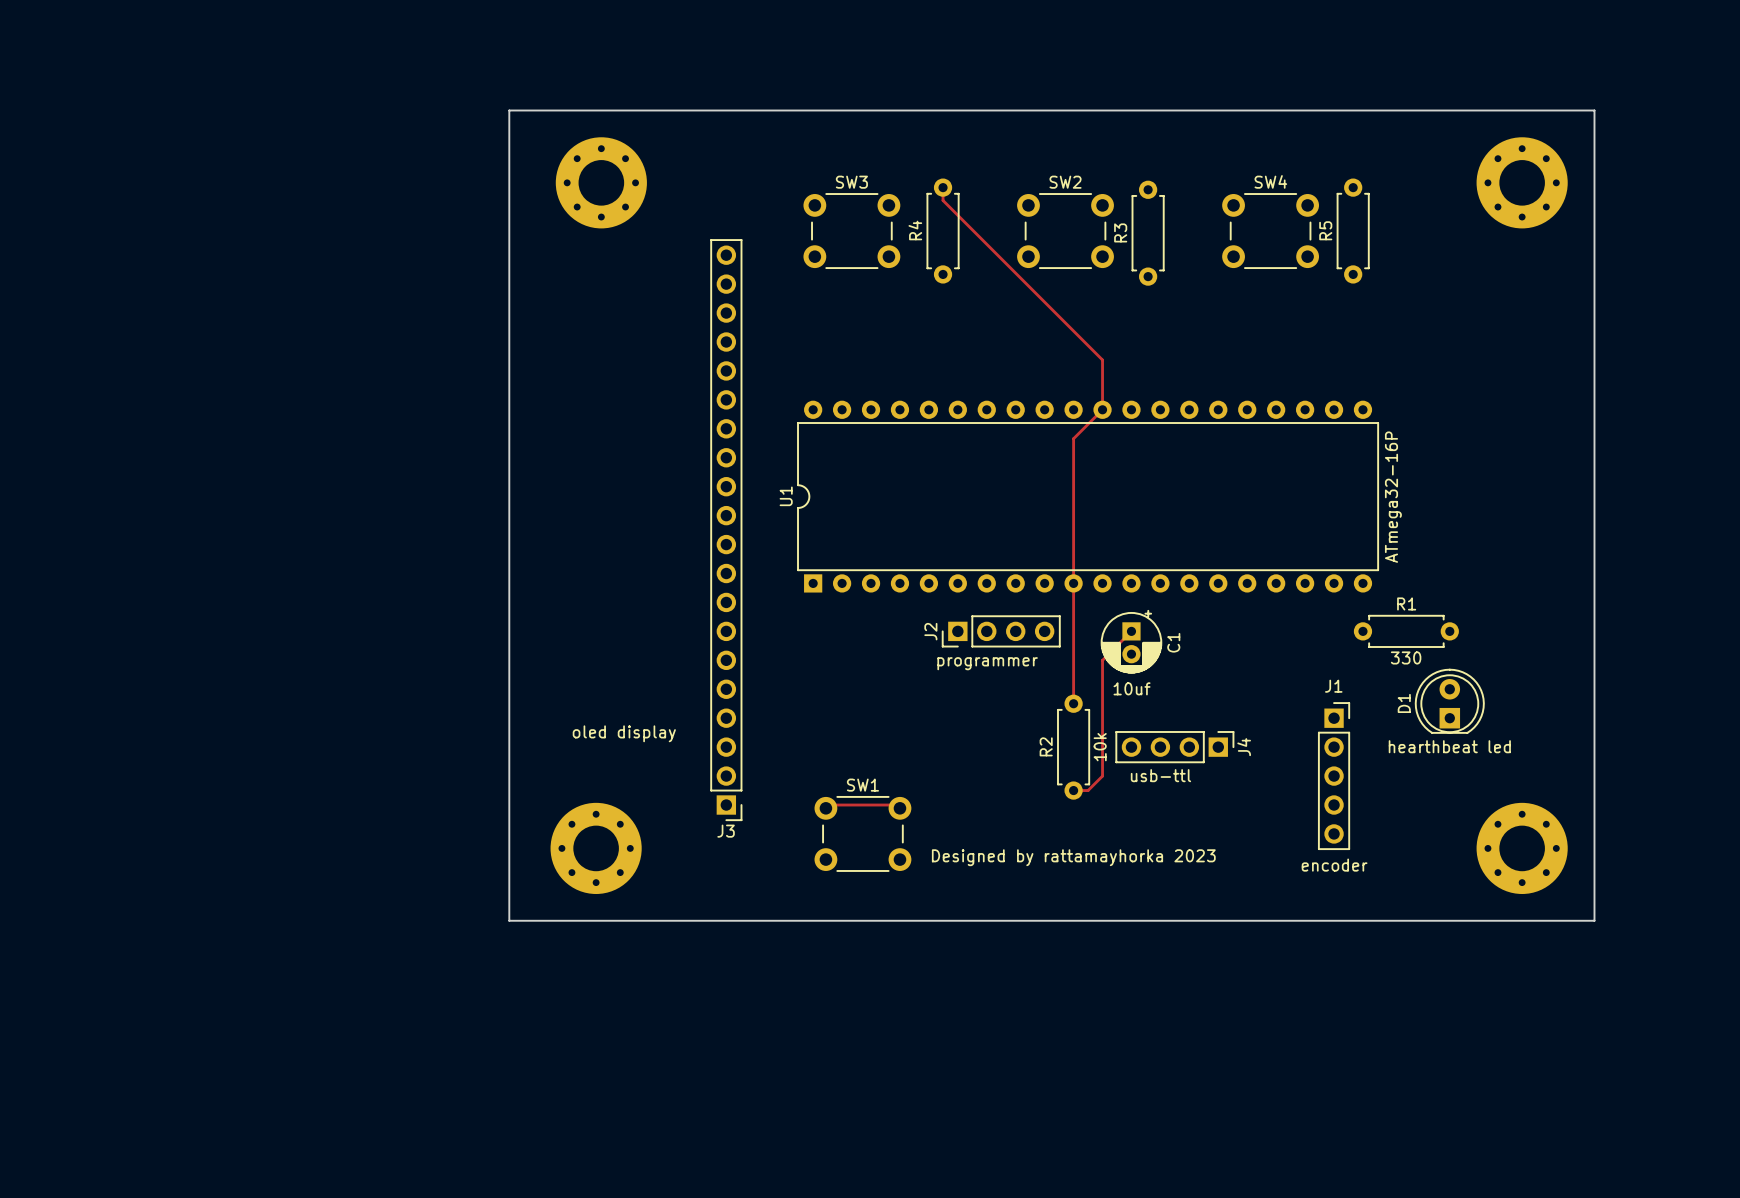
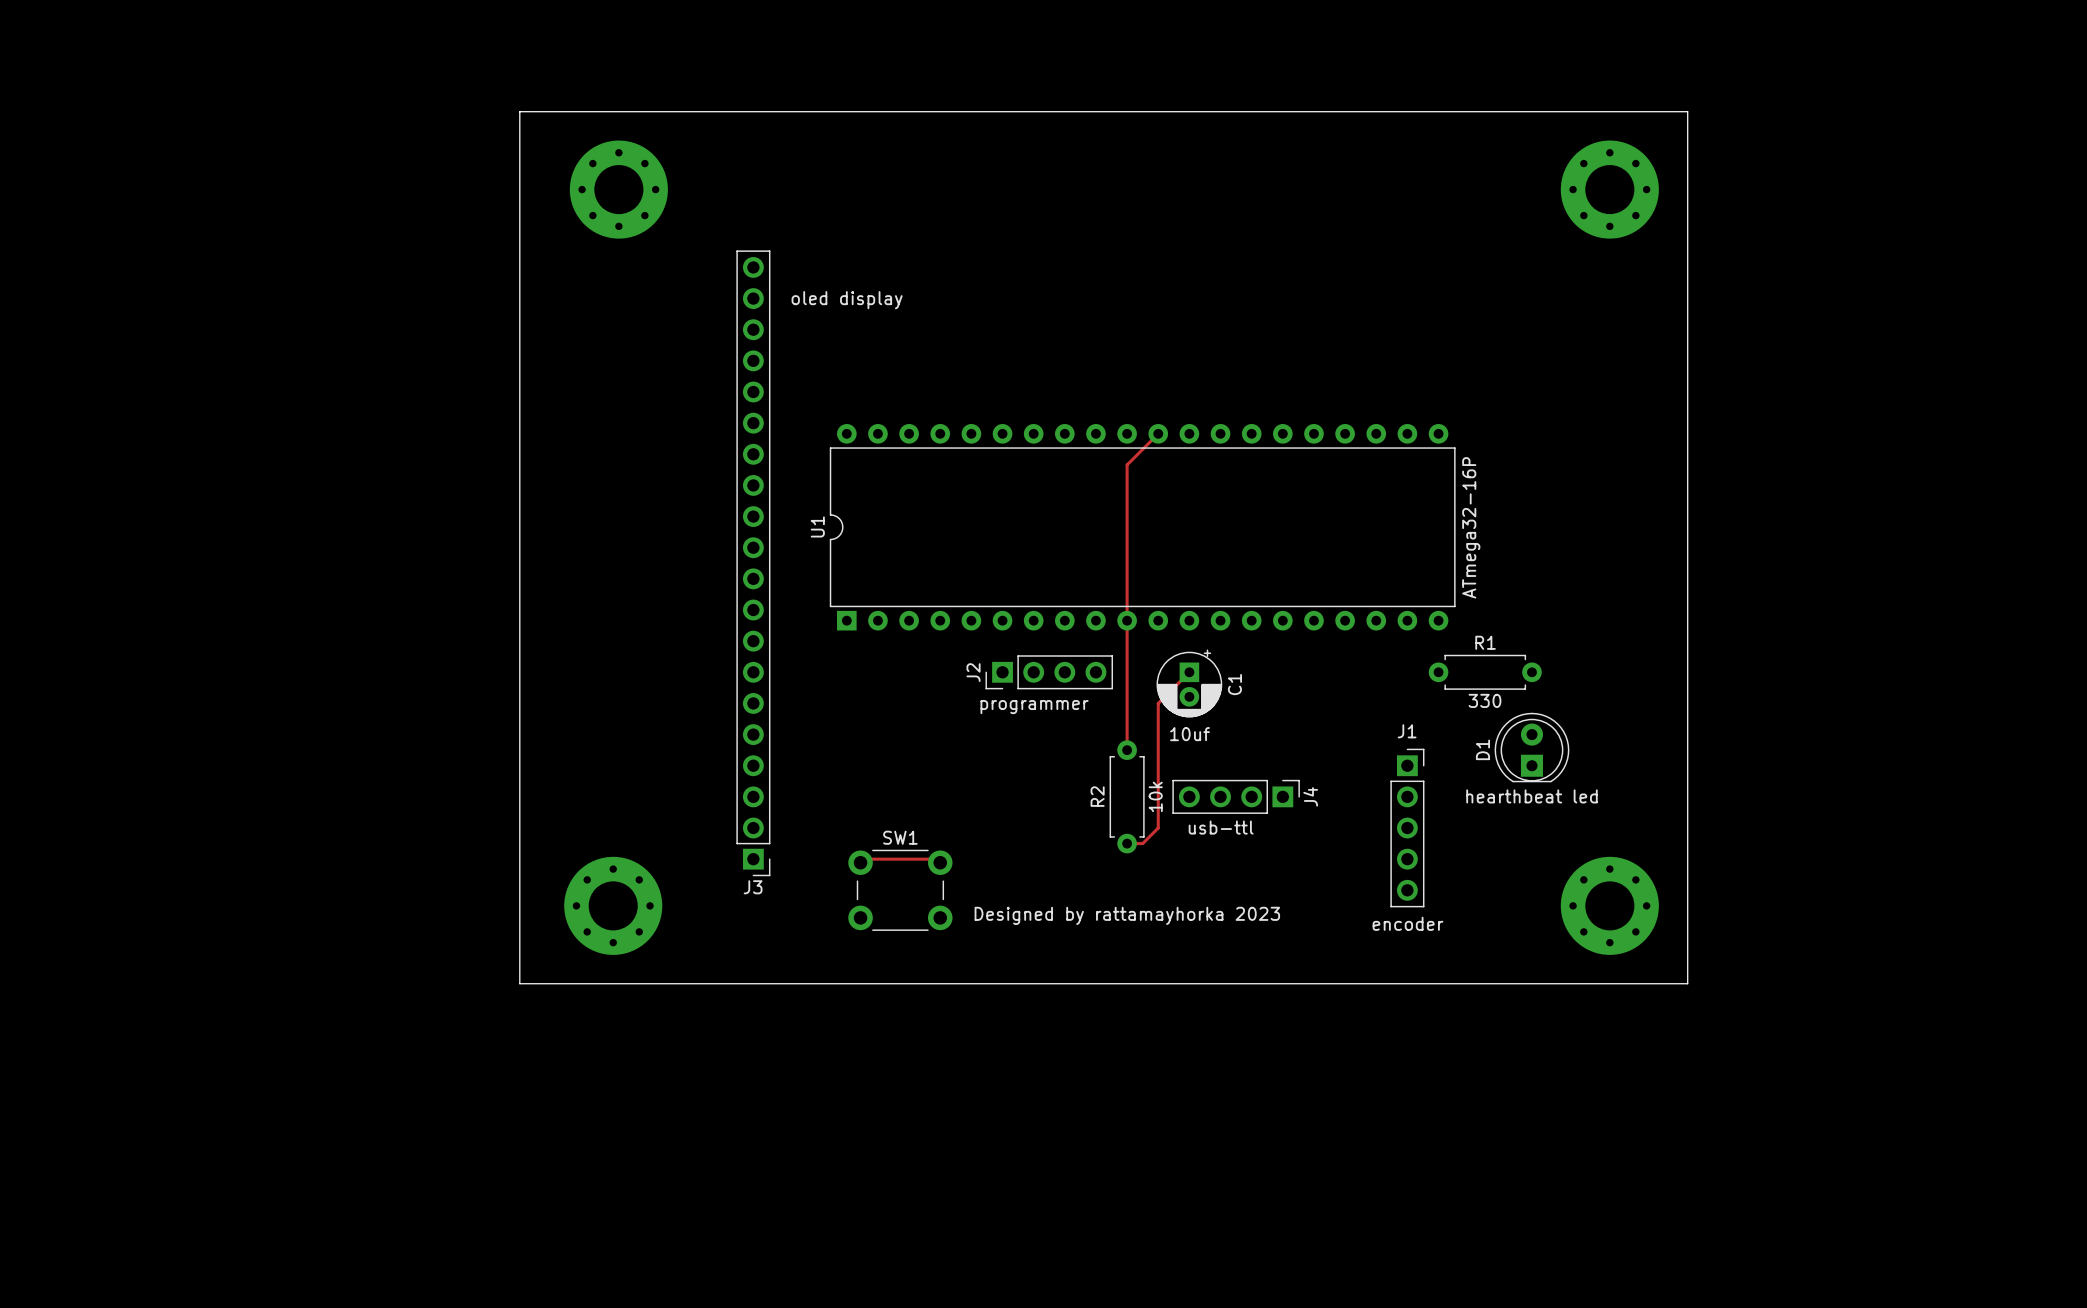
track: (943, 187) (943, 200) (1102, 360) (1102, 409) -> none
SW3: (851, 231) -> none
R4: (943, 231) -> none
SW2: (1065, 231) -> none
SW4: (1270, 231) -> none
R5: (1353, 231) -> none
R3: (1148, 233) -> none
J3 value position: oled display (624, 733) -> oled display (847, 300)

